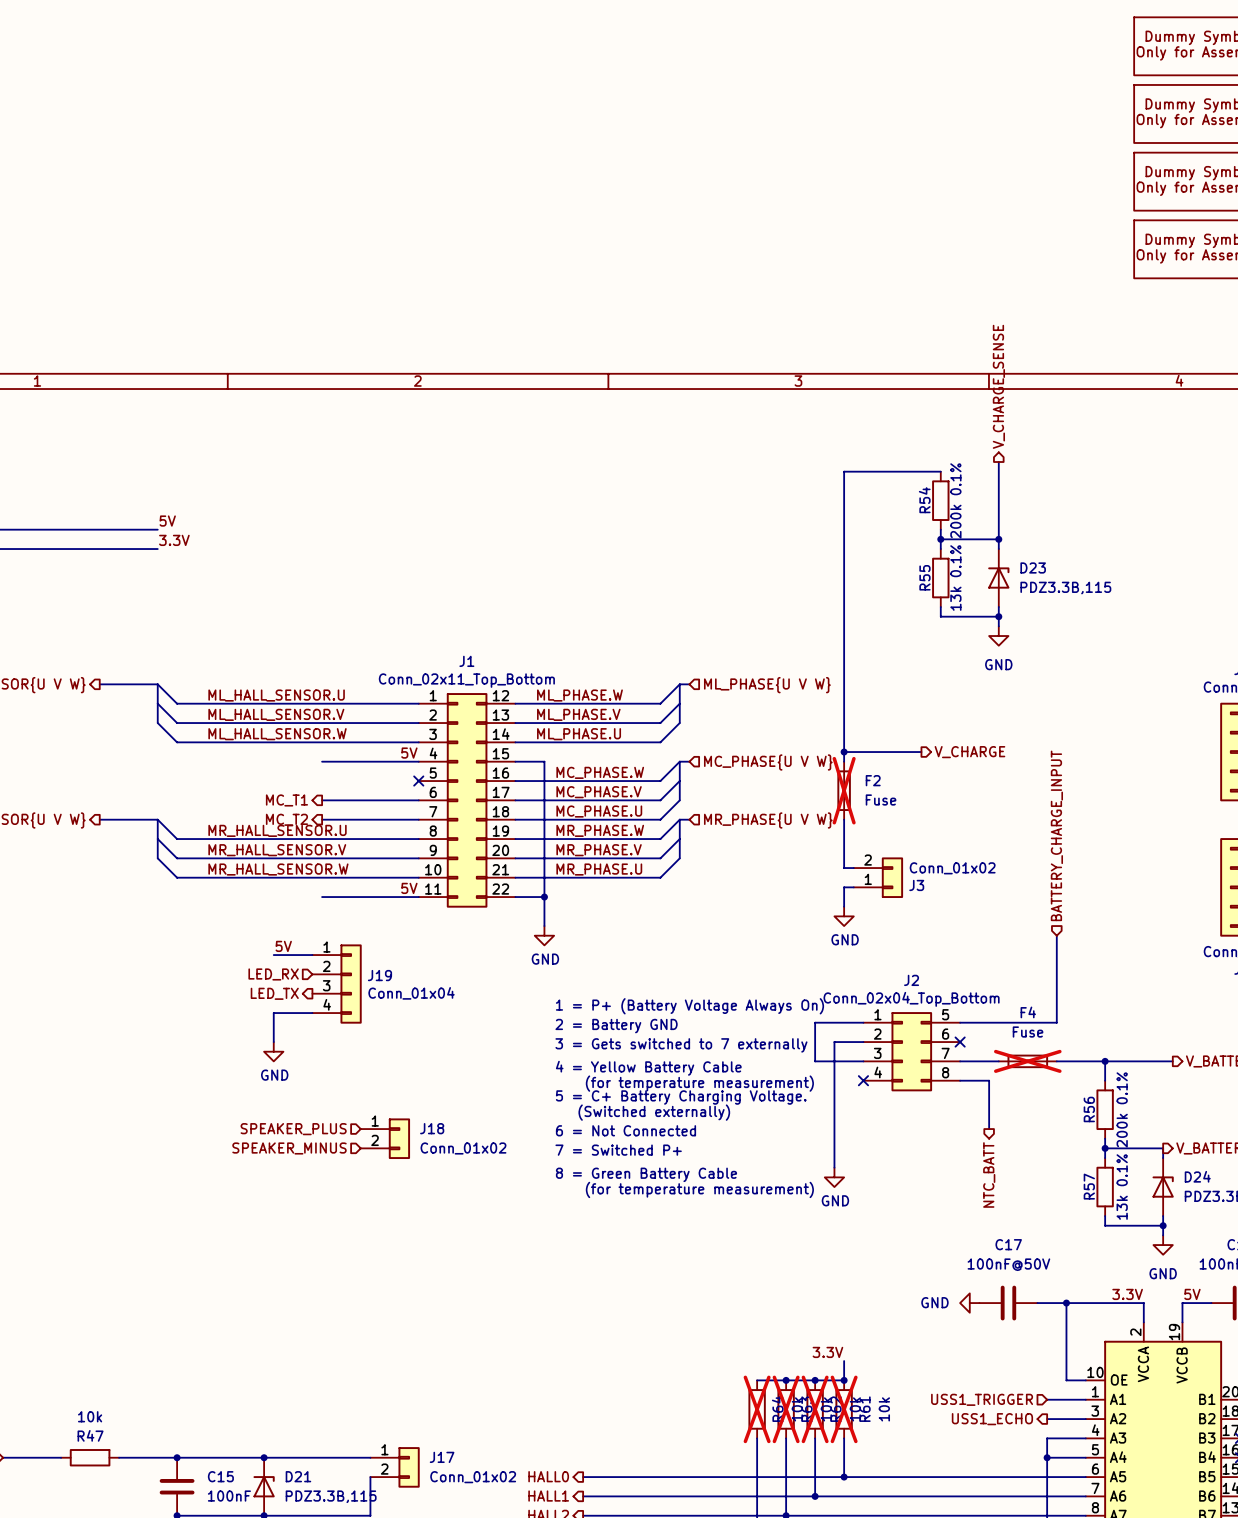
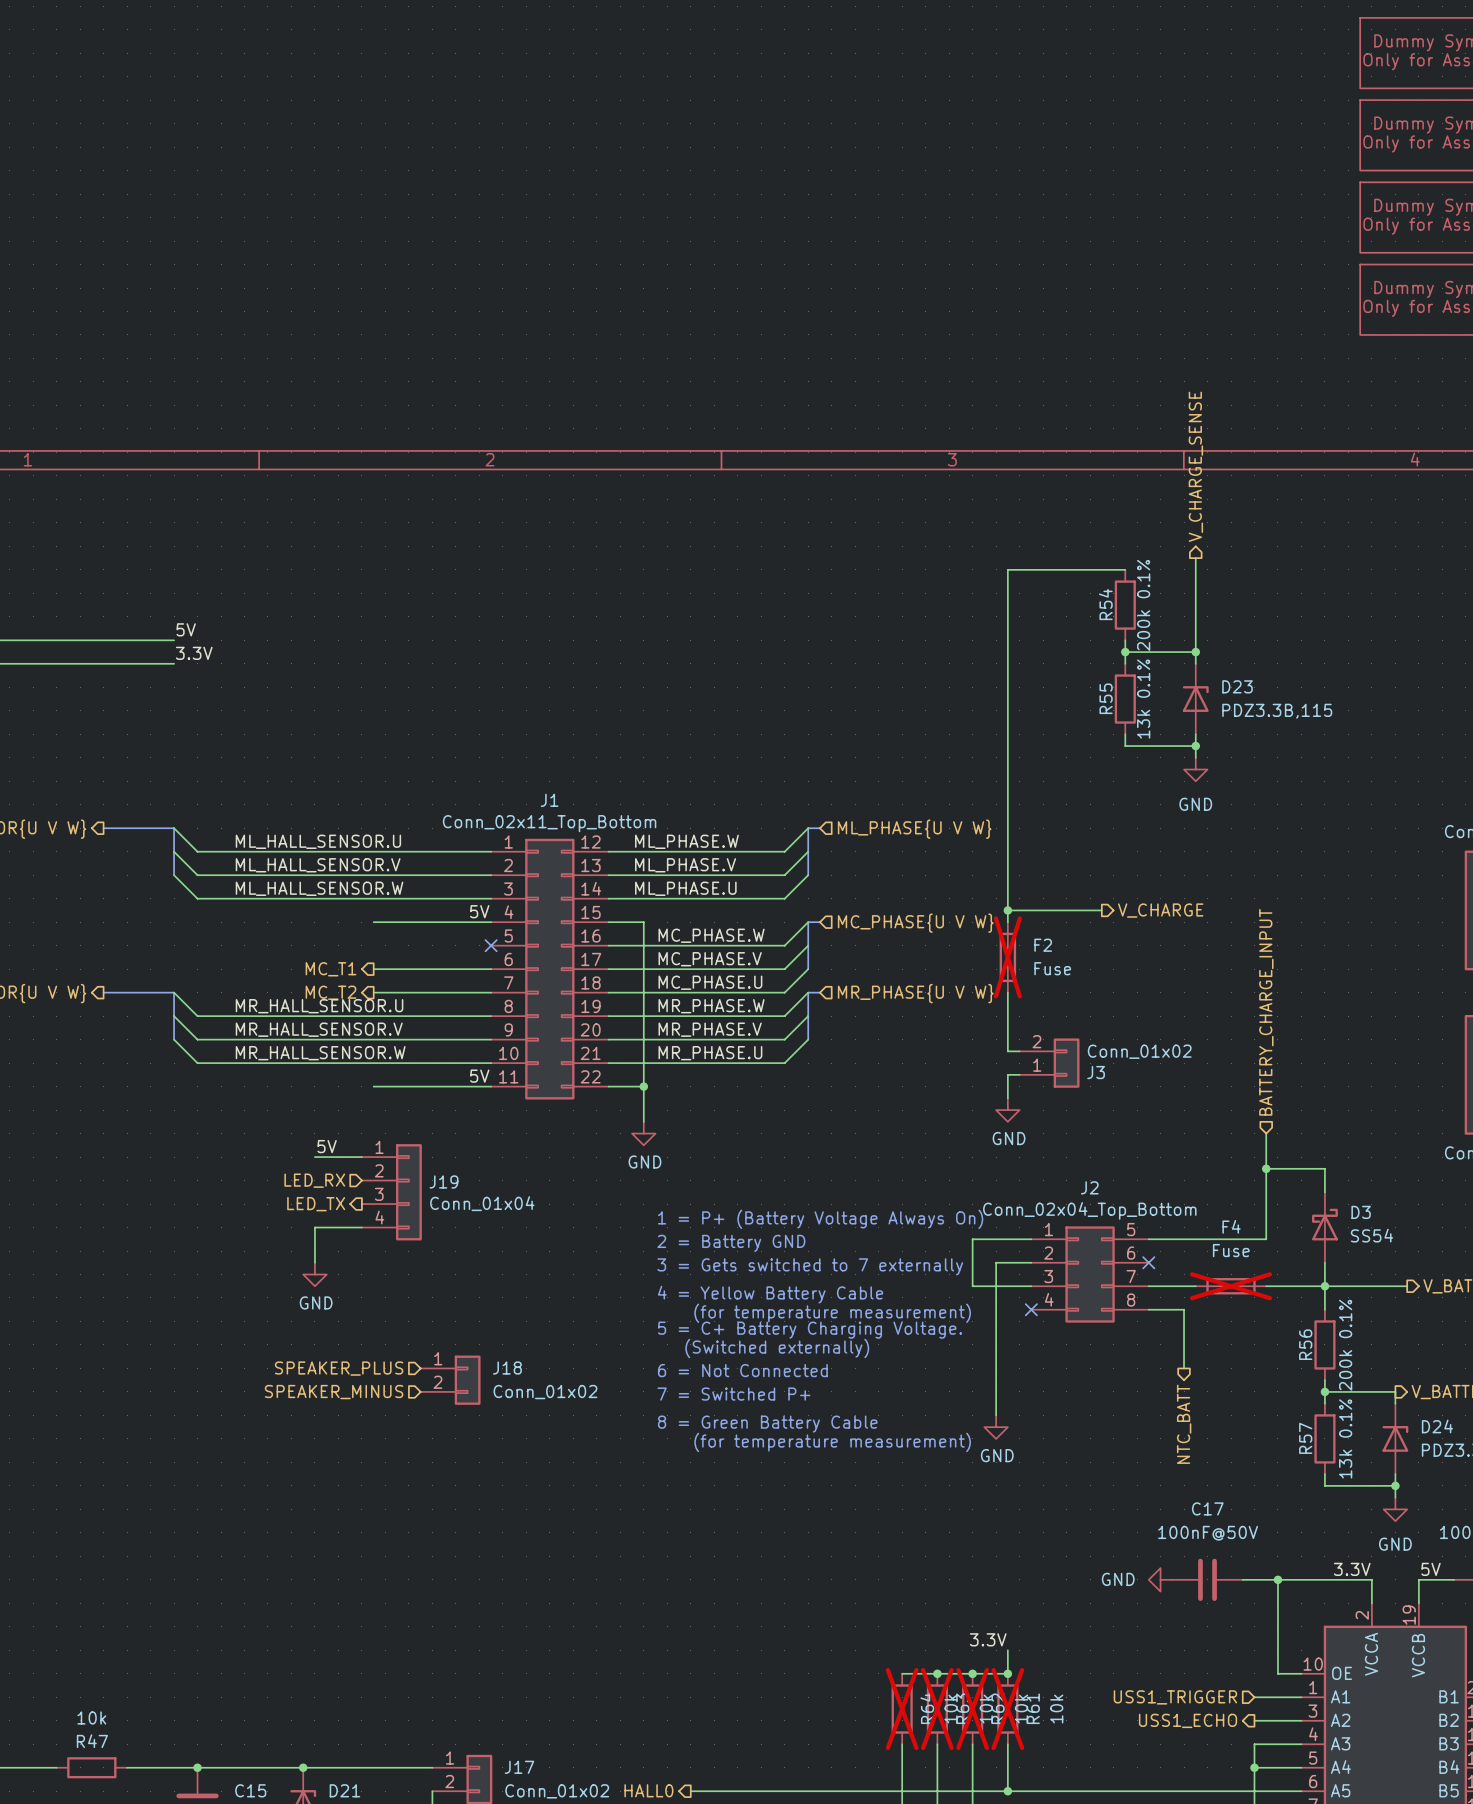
wire: none -> (1266, 1168) (1324, 1168) (1324, 1192)
junction: none -> (1266, 1168)
D3: none -> SS54 (1324, 1227)
wire: none -> (1324, 1262) (1324, 1286)

